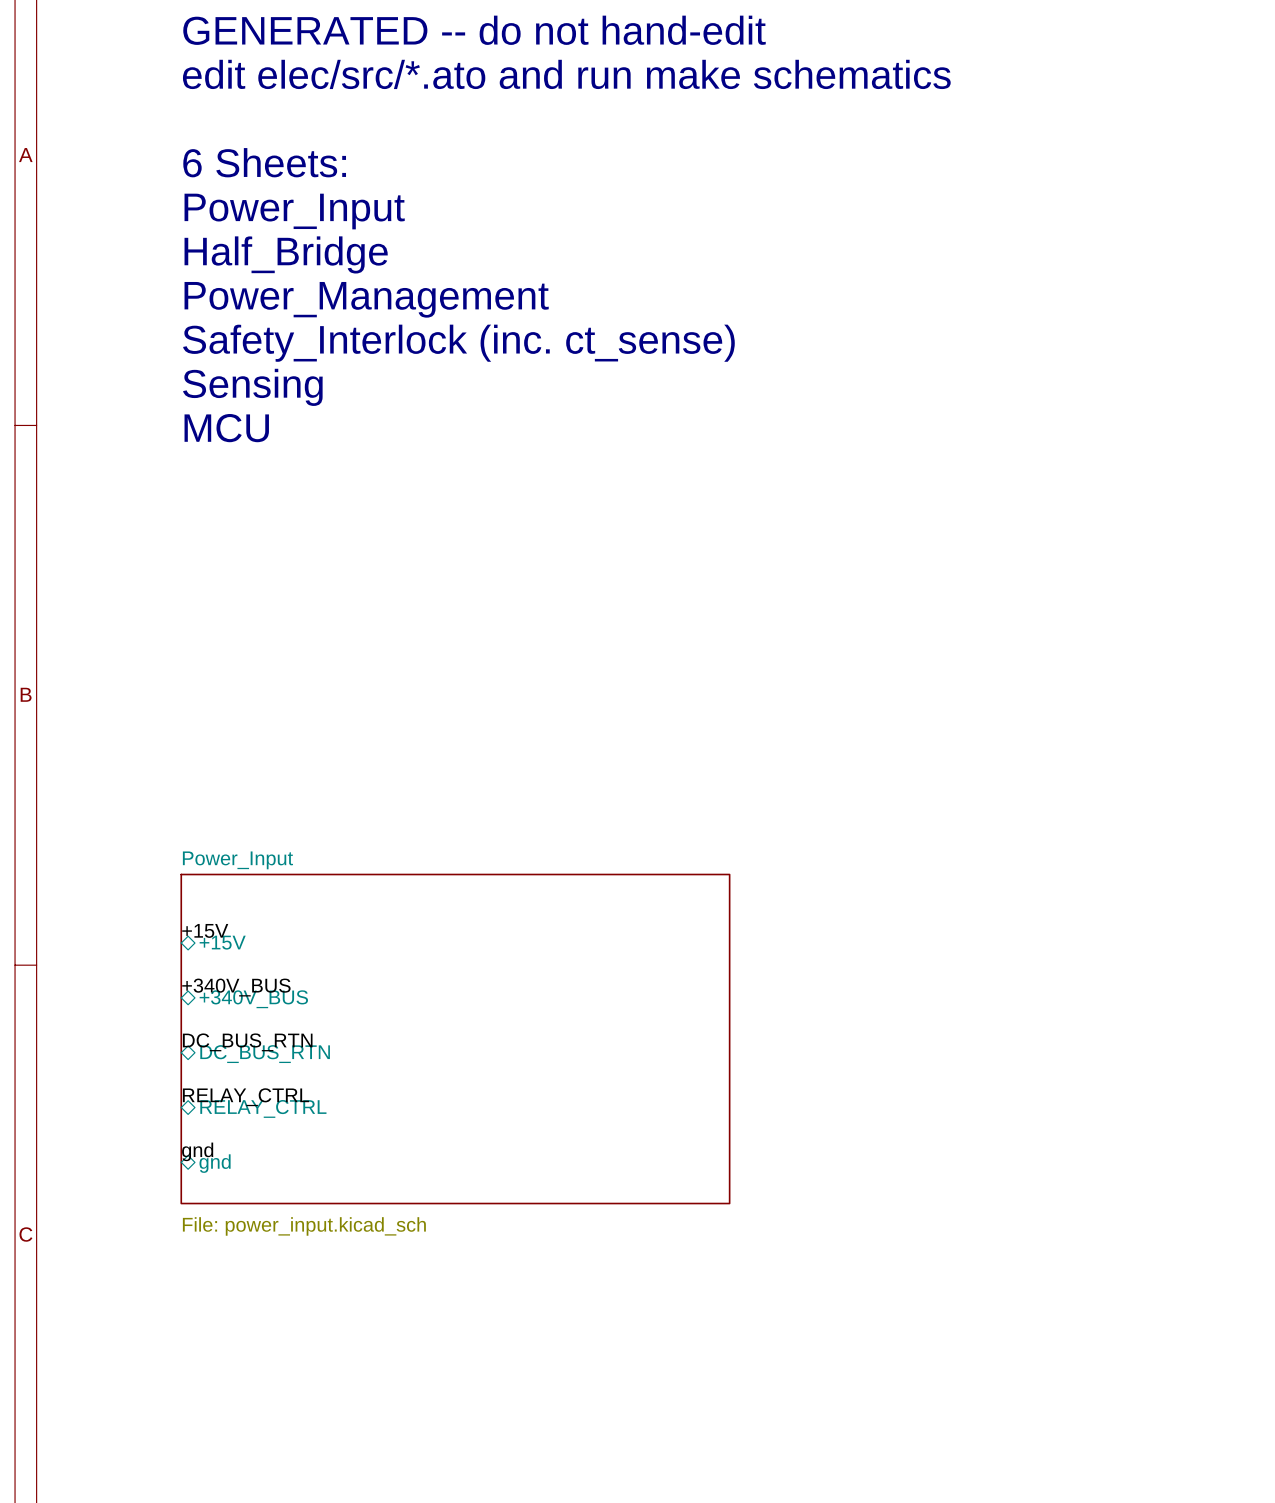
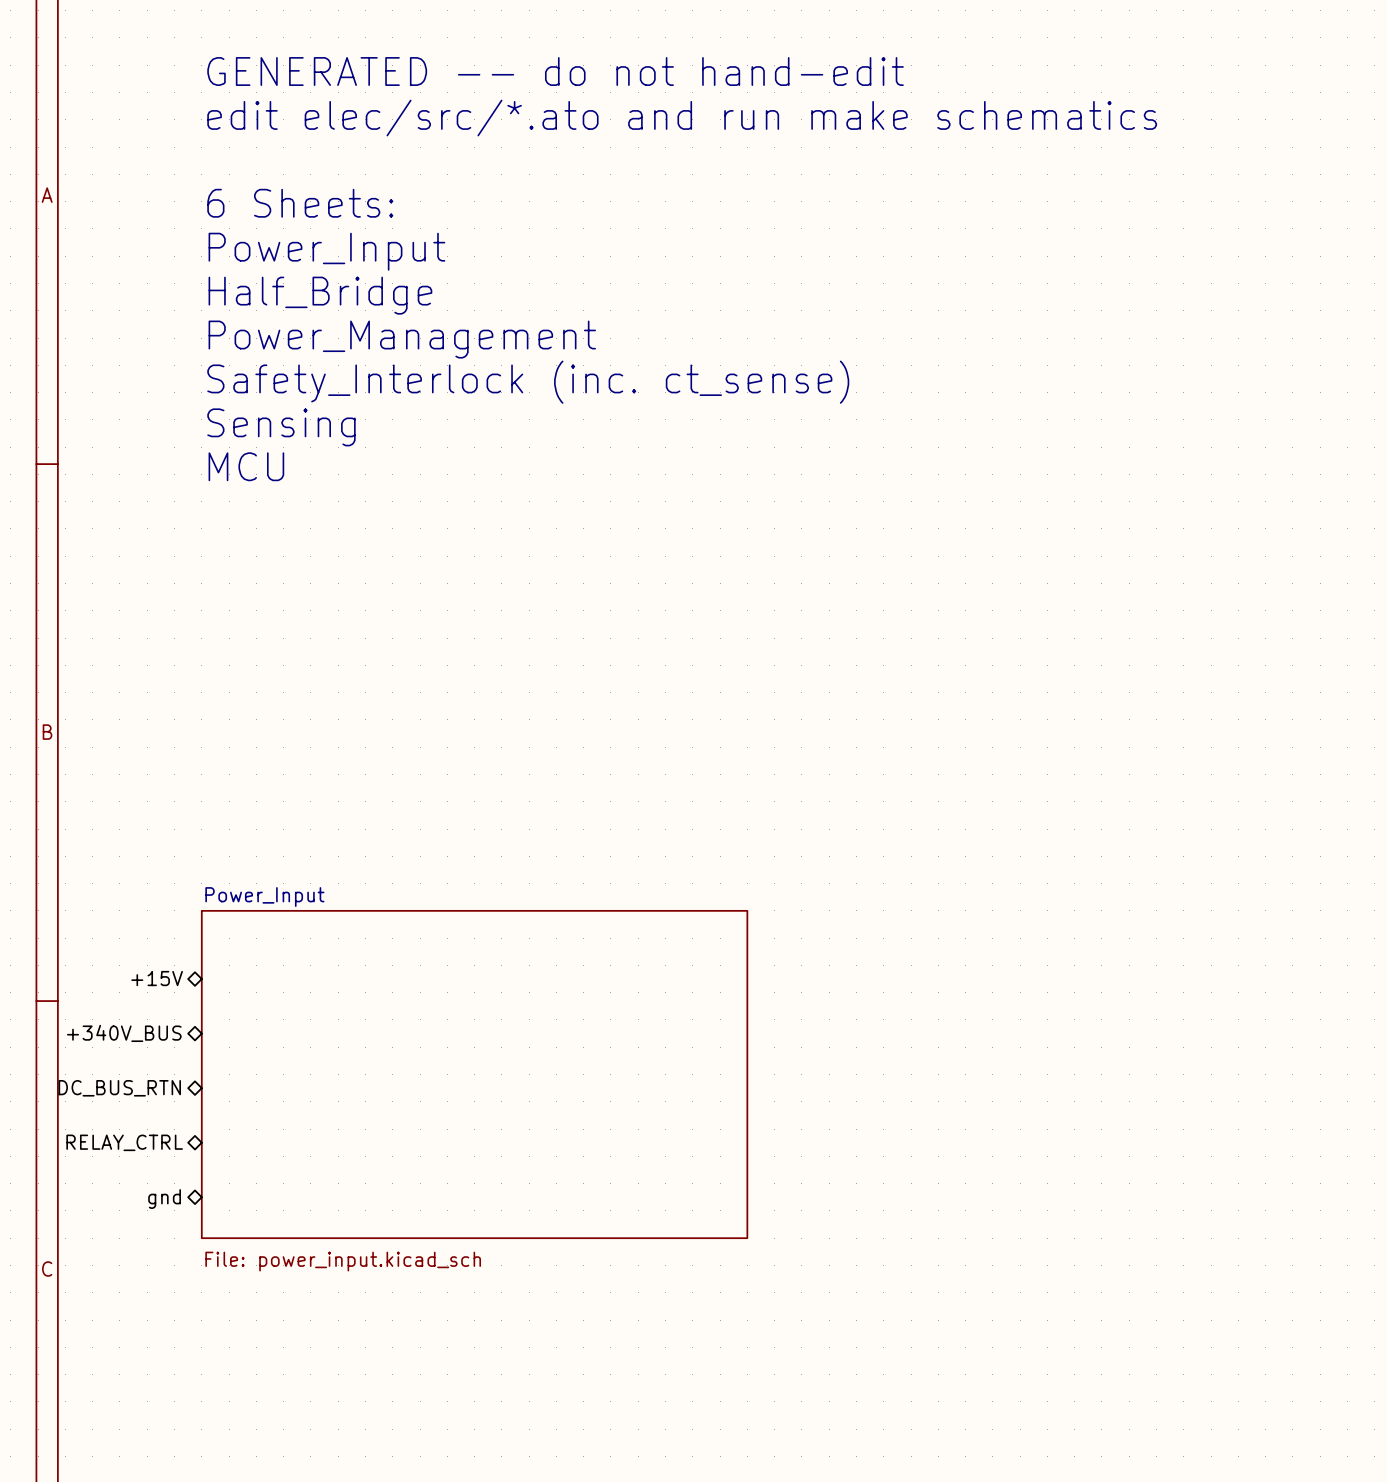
label: +15V (205, 930) -> none
sheet pin rotation: 0° (222, 942) -> 180° (157, 978)
sheet pin position: +15V (222, 942) -> +15V (157, 978)
label: +340V_BUS (236, 987) -> none
sheet pin rotation: 0° (253, 999) -> 180° (124, 1033)
sheet pin position: +340V_BUS (253, 999) -> +340V_BUS (124, 1033)
label: DC_BUS_RTN (247, 1042) -> none
sheet pin rotation: 0° (265, 1054) -> 180° (119, 1088)
sheet pin position: DC_BUS_RTN (265, 1054) -> DC_BUS_RTN (119, 1088)
label: RELAY_CTRL (245, 1097) -> none
sheet pin rotation: 0° (263, 1108) -> 180° (124, 1142)
sheet pin position: RELAY_CTRL (263, 1108) -> RELAY_CTRL (124, 1142)
label: gnd (197, 1151) -> none
sheet pin rotation: 0° (215, 1163) -> 180° (164, 1199)
sheet pin position: gnd (215, 1163) -> gnd (164, 1199)

